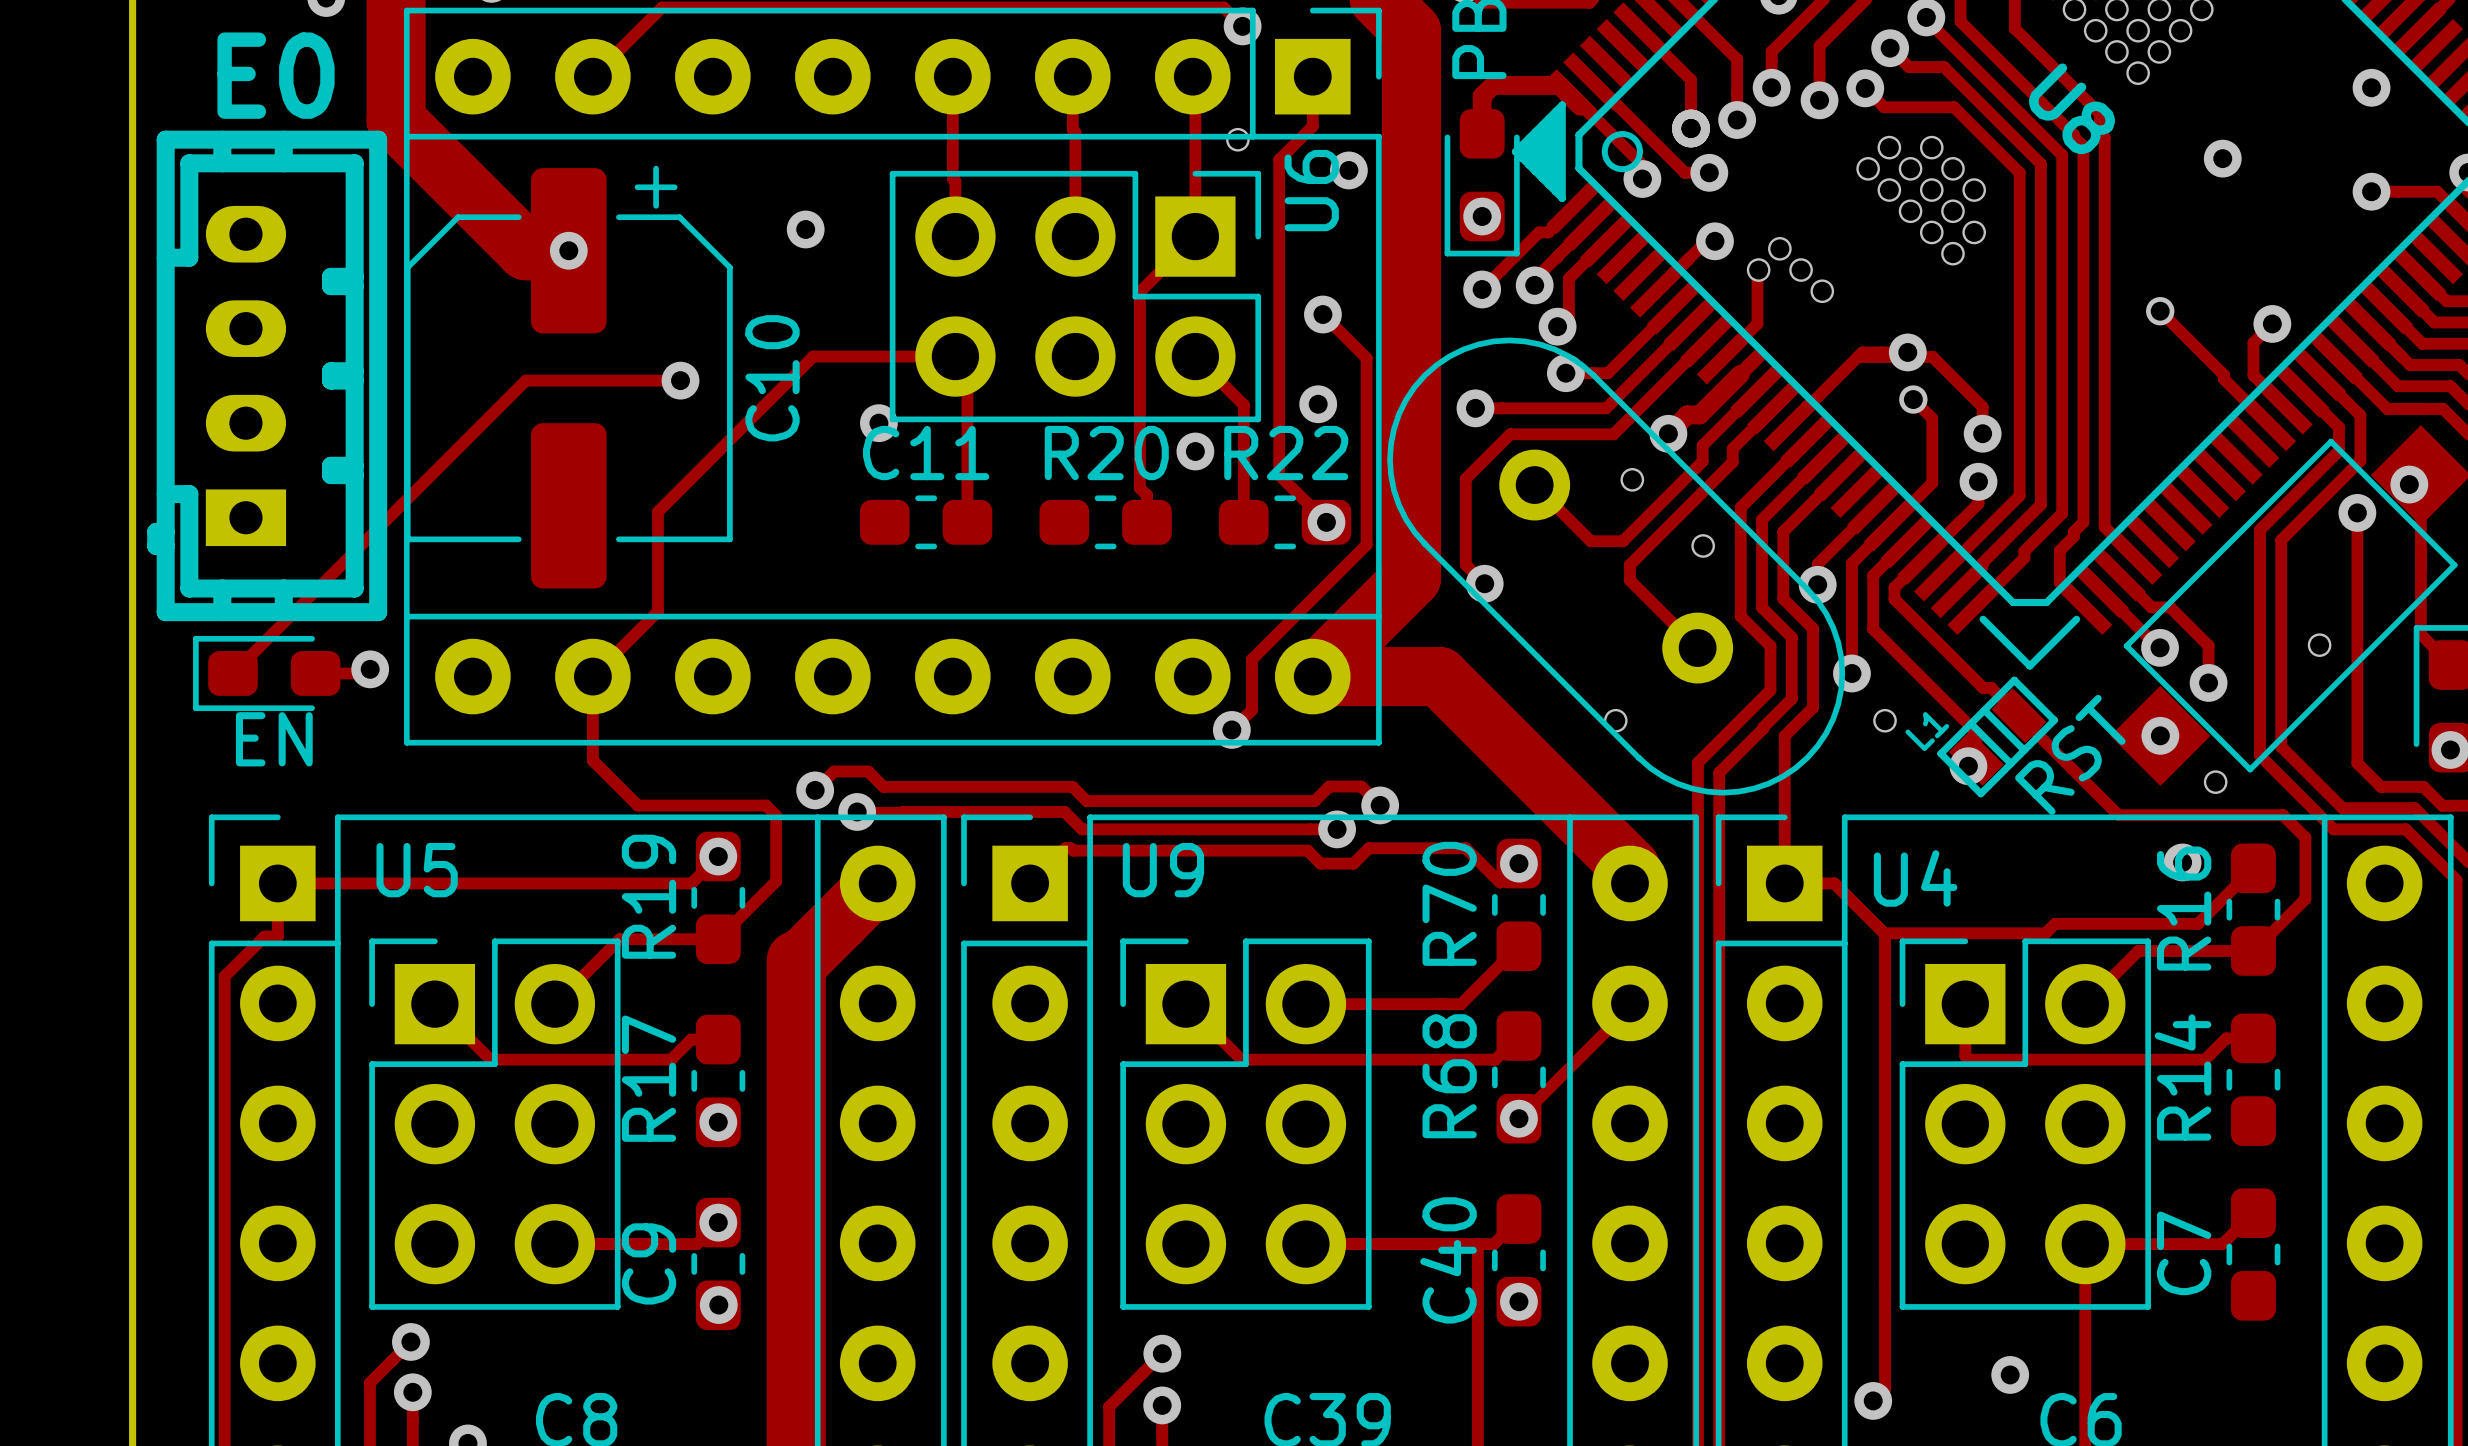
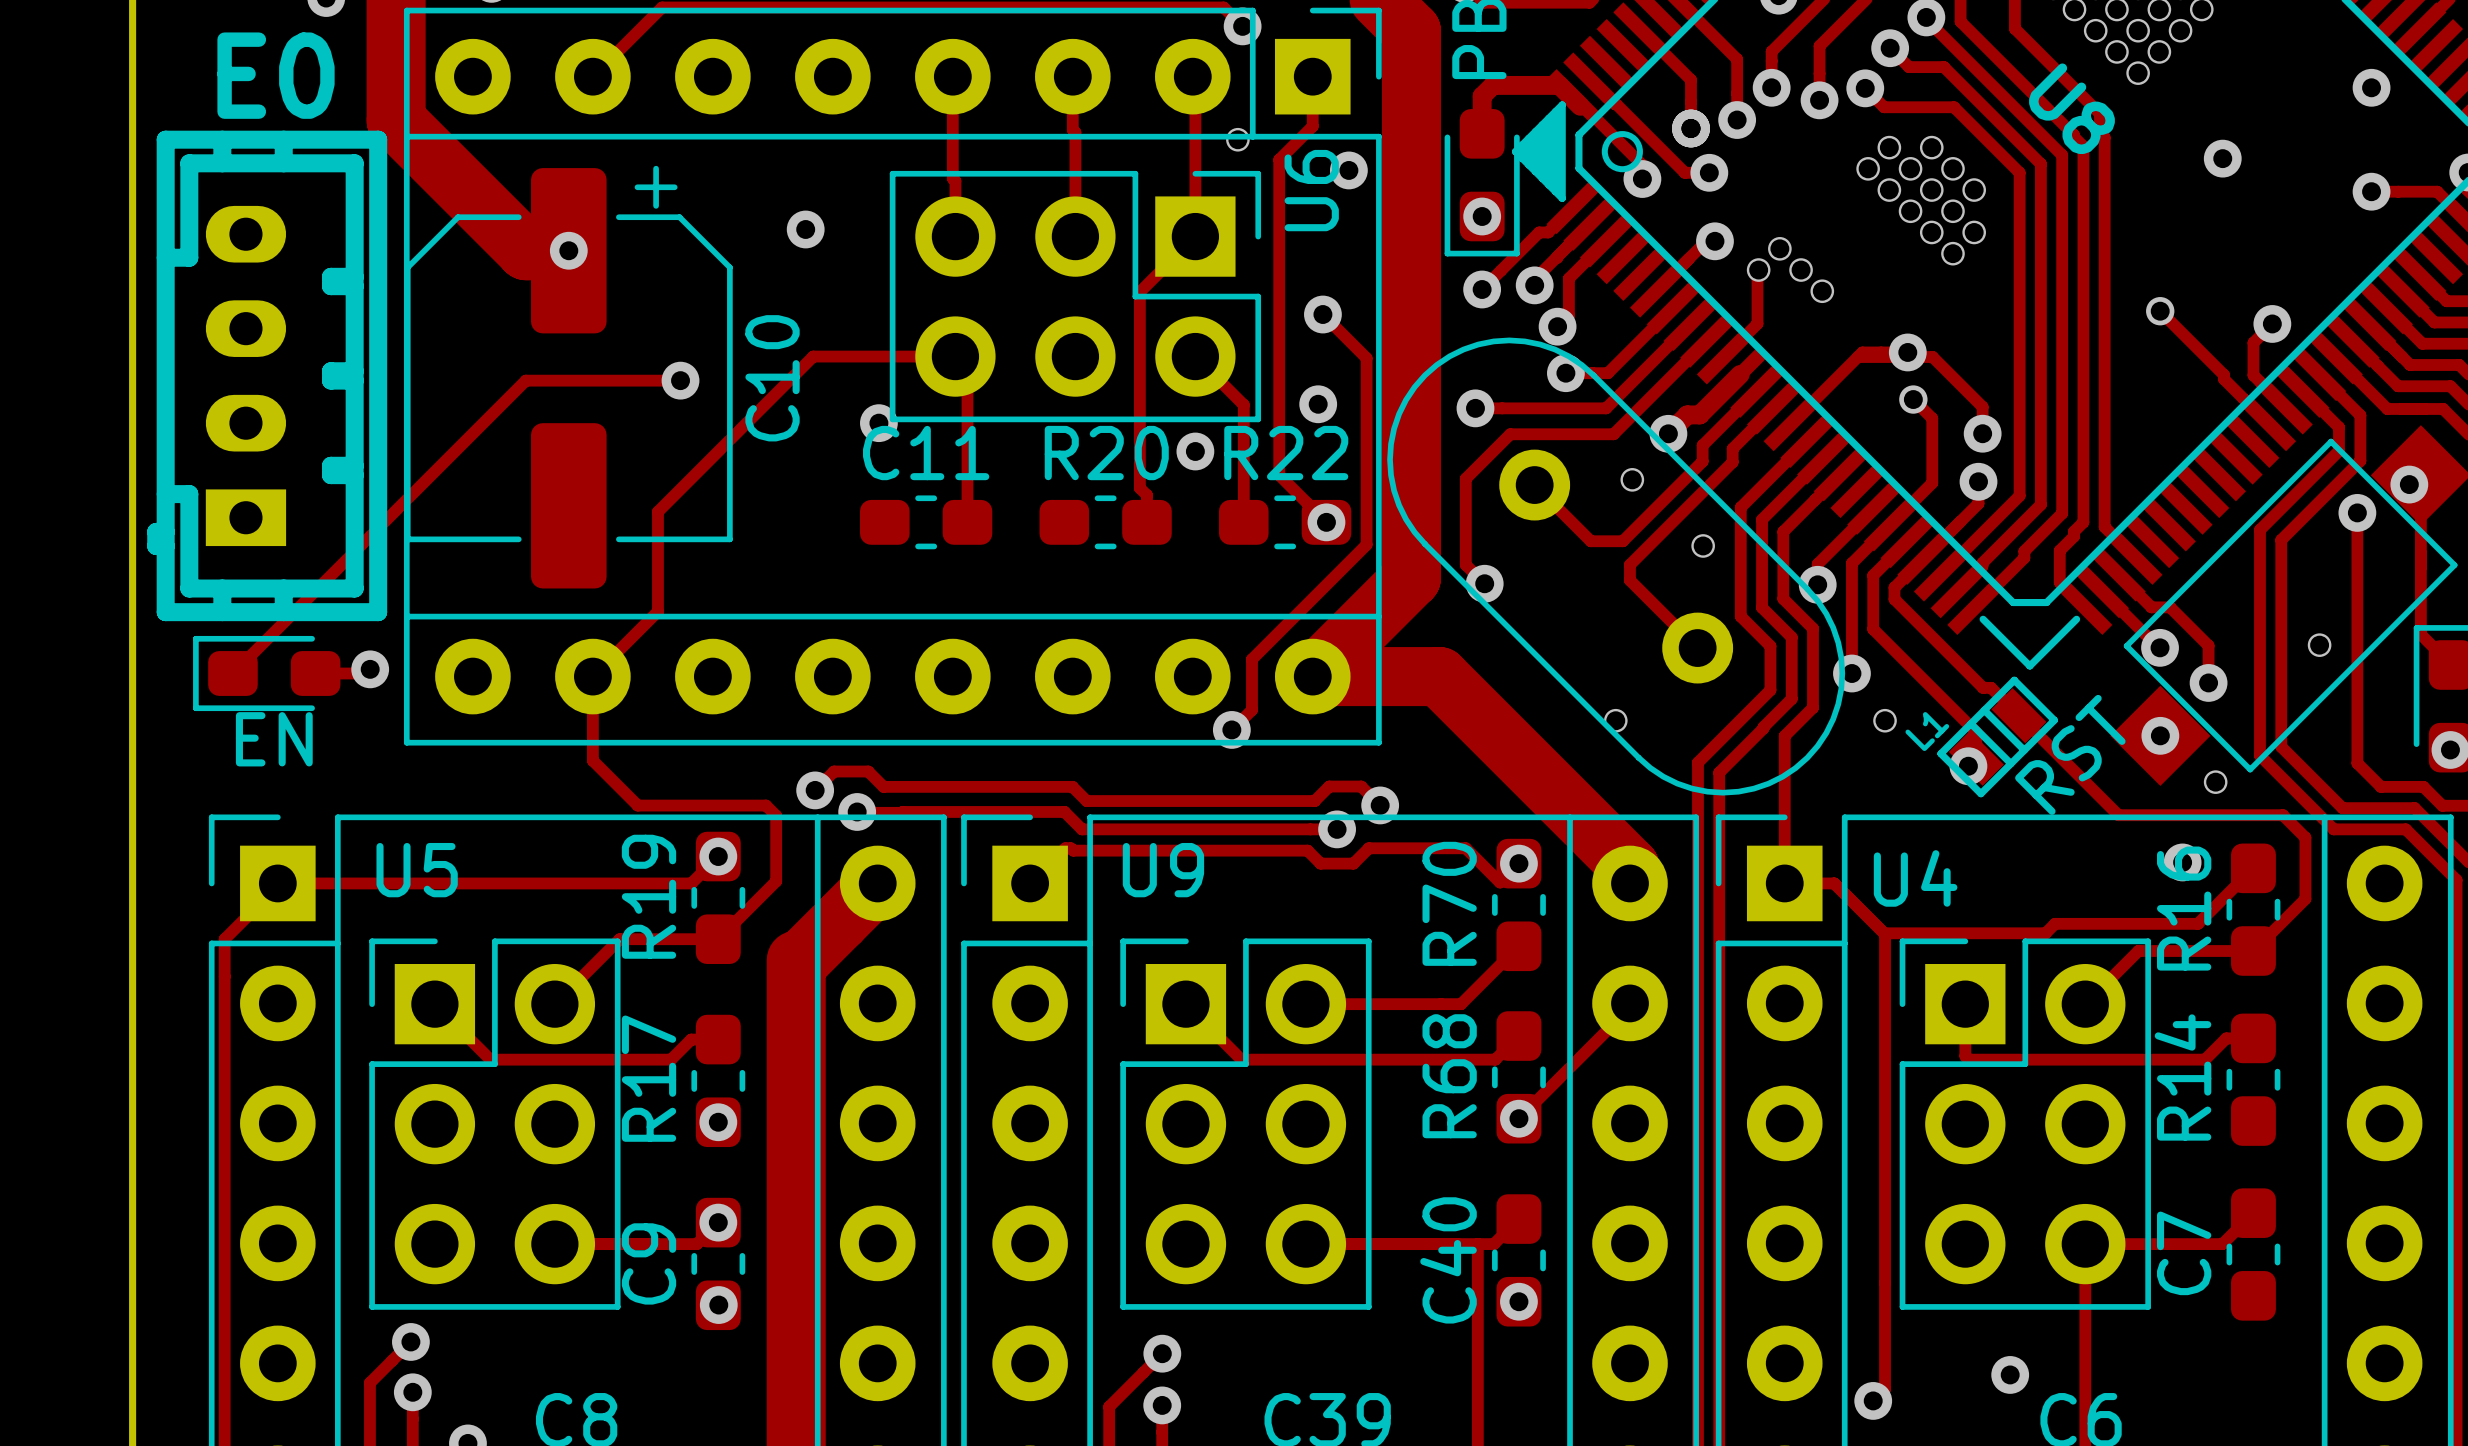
track: (277, 886) (277, 936) (264, 936) (224, 976) -> (277, 886) (224, 939) (224, 976)

